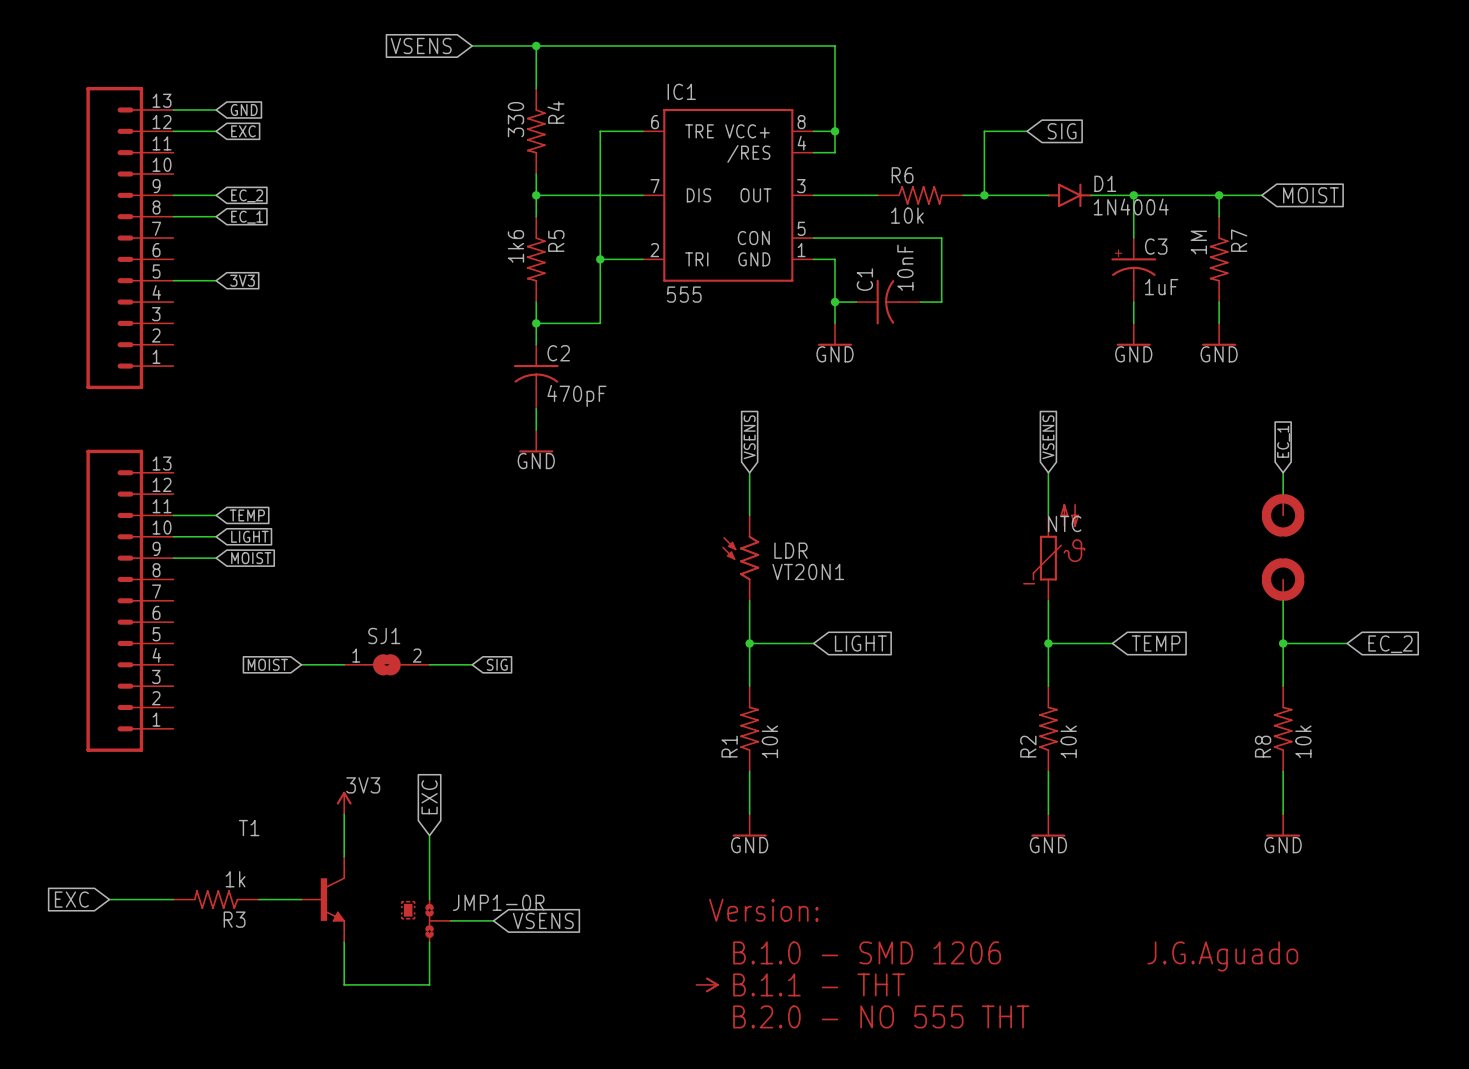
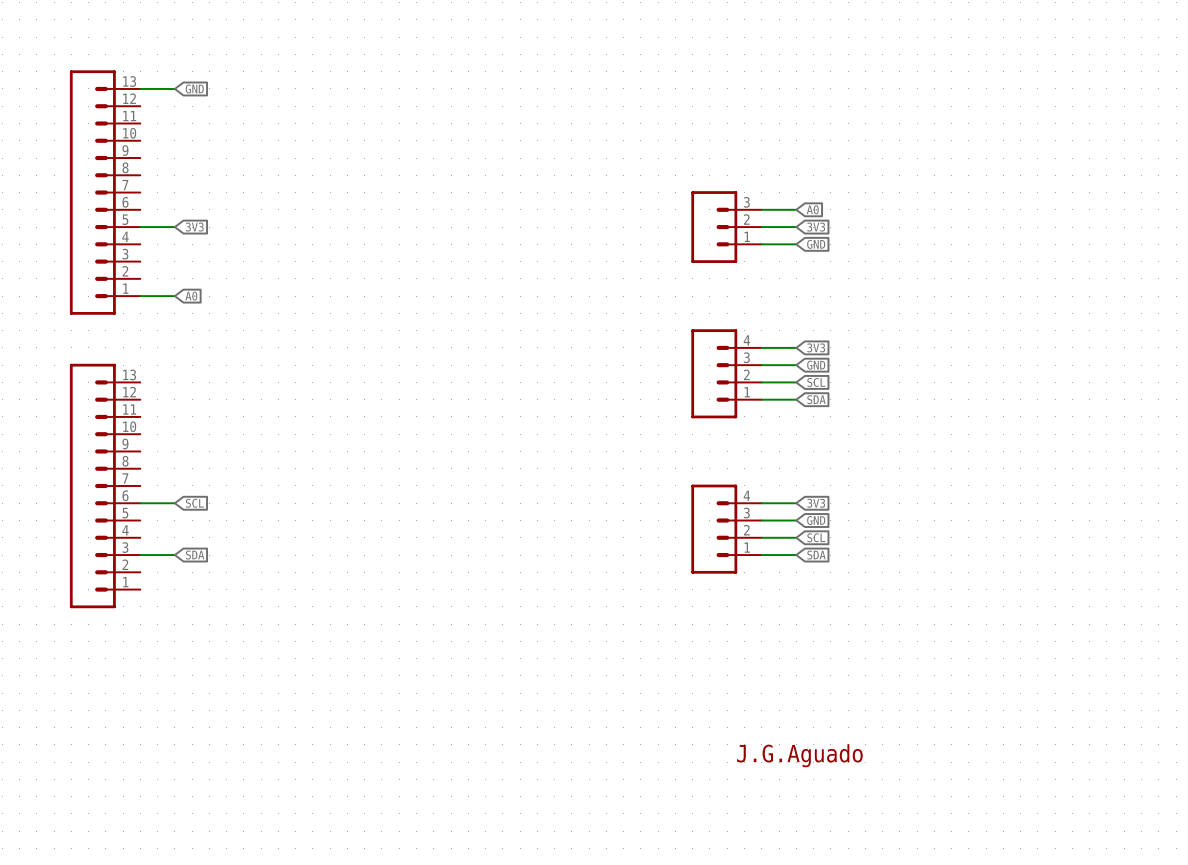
global label: VSENS (421, 45) -> none
wire: (472, 45) (835, 45) (835, 152) (813, 152) -> none
wire: (536, 45) (536, 88) -> none
junction: (536, 45) -> none
wire: (173, 131) (216, 131) -> none
global label: EXC (243, 131) -> none
R4: 330 (536, 131) -> none
wire: (642, 131) (600, 131) (600, 323) (536, 323) -> none
wire: (813, 131) (835, 131) -> none
junction: (835, 131) -> none
wire: (1027, 131) (984, 131) (984, 195) -> none
global label: SIG (1062, 131) -> none
wire: (536, 174) (536, 216) -> none
wire: (173, 195) (216, 195) -> none
global label: EC_2 (247, 195) -> none
wire: (536, 195) (642, 195) -> none
junction: (536, 195) -> none
IC1: 555 (728, 195) -> none
wire: (813, 195) (877, 195) -> none
R6: 10k (920, 195) -> none
wire: (963, 195) (1048, 195) -> none
junction: (984, 195) -> none
D1: 1N4004 (1069, 195) -> none
wire: (1091, 195) (1261, 195) -> none
wire: (1133, 195) (1133, 238) -> none
junction: (1133, 195) -> none
wire: (1219, 195) (1219, 216) -> none
junction: (1219, 195) -> none
global label: MOIST (1310, 195) -> none
wire: (173, 216) (216, 216) -> (140, 296) (174, 296)
global label: EC_1 (247, 217) -> none
wire: (813, 238) (941, 238) (941, 302) (920, 302) -> none
R5: 1k6 (536, 259) -> none
wire: (600, 259) (642, 259) -> none
junction: (600, 259) -> none
wire: (813, 259) (835, 259) (835, 323) -> none
wire: none -> (761, 209) (796, 209)
global label: none -> A0 (812, 209)
R7: 1M (1219, 259) -> none
C3: 1uF (1133, 270) -> none
part: none -> (726, 227)
wire: none -> (761, 227) (796, 227)
global label: none -> 3V3 (816, 227)
wire: (536, 302) (536, 344) -> none
wire: (835, 302) (856, 302) -> none
junction: (835, 302) -> none
C1: 10nF (888, 302) -> none
wire: none -> (761, 244) (796, 244)
global label: none -> GND (816, 244)
wire: (1133, 302) (1133, 323) -> none
wire: (1219, 302) (1219, 323) -> none
junction: (536, 323) -> none
power symbol: GND (835, 334) -> none
power symbol: GND (1133, 334) -> none
power symbol: GND (1219, 334) -> none
global label: none -> A0 (191, 296)
C2: 470pF (536, 376) -> none
wire: (536, 408) (536, 430) -> none
wire: none -> (761, 347) (796, 347)
global label: none -> 3V3 (816, 347)
global label: VSENS (749, 437) -> none
global label: VSENS (1048, 437) -> none
power symbol: GND (536, 441) -> none
global label: EC_1 (1283, 441) -> none
wire: none -> (761, 365) (796, 365)
global label: none -> GND (816, 365)
part: none -> (726, 373)
wire: (749, 472) (749, 515) -> none
wire: none -> (761, 382) (796, 382)
global label: none -> SCL (816, 382)
wire: (1048, 472) (1048, 515) -> none
wire: (1283, 472) (1283, 494) -> none
wire: none -> (761, 399) (796, 399)
global label: none -> SDA (816, 399)
wire: (173, 515) (216, 515) -> none
global label: TEMP (247, 515) -> none
part: (1283, 515) -> none
wire: (173, 536) (216, 536) -> (140, 555) (174, 555)
global label: LIGHT (249, 536) -> none
NTC: (1054, 552) -> none
wire: (173, 558) (216, 558) -> (140, 503) (174, 503)
global label: MOIST (251, 558) -> none
LDR: VT20N1 (740, 558) -> none
part: (1283, 579) -> none
wire: (749, 600) (749, 686) -> none
wire: (1048, 600) (1048, 686) -> none
wire: (1283, 600) (1283, 686) -> none
global label: none -> SCL (194, 503)
wire: none -> (761, 503) (796, 503)
global label: none -> 3V3 (816, 503)
wire: (749, 643) (813, 643) -> none
junction: (749, 643) -> none
global label: LIGHT (860, 643) -> none
wire: none -> (761, 520) (796, 520)
global label: none -> GND (816, 520)
wire: (1048, 643) (1112, 643) -> none
junction: (1048, 643) -> none
global label: TEMP (1156, 643) -> none
wire: (1283, 643) (1347, 643) -> none
junction: (1283, 643) -> none
global label: EC_2 (1390, 644) -> none
part: none -> (726, 529)
global label: MOIST (267, 664) -> none
wire: (301, 664) (344, 664) -> none
SJ1: (386, 664) -> none
wire: (429, 664) (472, 664) -> none
global label: SIG (497, 664) -> none
wire: none -> (761, 537) (796, 537)
global label: none -> SCL (816, 537)
global label: none -> SDA (195, 555)
wire: none -> (761, 555) (796, 555)
global label: none -> SDA (816, 555)
R1: 10k (749, 728) -> none
R2: 10k (1048, 728) -> none
R8: 10k (1283, 728) -> none
wire: (749, 771) (749, 814) -> none
wire: (1048, 771) (1048, 814) -> none
wire: (1283, 771) (1283, 814) -> none
label: 3V3 (363, 785) -> none
global label: EXC (429, 797) -> none
power symbol: (344, 803) -> none
wire: (344, 814) (344, 856) -> none
power symbol: GND (749, 825) -> none
power symbol: GND (1048, 825) -> none
power symbol: GND (1283, 825) -> none
wire: (429, 835) (429, 899) -> none
global label: EXC (71, 899) -> none
wire: (109, 899) (173, 899) -> none
R3: 1k (216, 899) -> none
wire: (258, 899) (301, 899) -> none
T1: (323, 899) -> none
part: (408, 910) -> none
text: Version: (763, 910) -> none
JMP1-0R: (438, 920) -> none
wire: (450, 920) (493, 920) -> none
global label: VSENS (543, 920) -> none
text: none -> J.G.Aguado (799, 755)
wire: (344, 942) (344, 984) (429, 984) (429, 942) -> none
text: B.1.0 - SMD 1206 (867, 952) -> none
text: J.G.Aguado (1222, 956) -> none
power symbol: (707, 984) -> none
text: B.1.1 - THT (819, 984) -> none
text: B.2.0 - NO 555 THT (881, 1016) -> none

